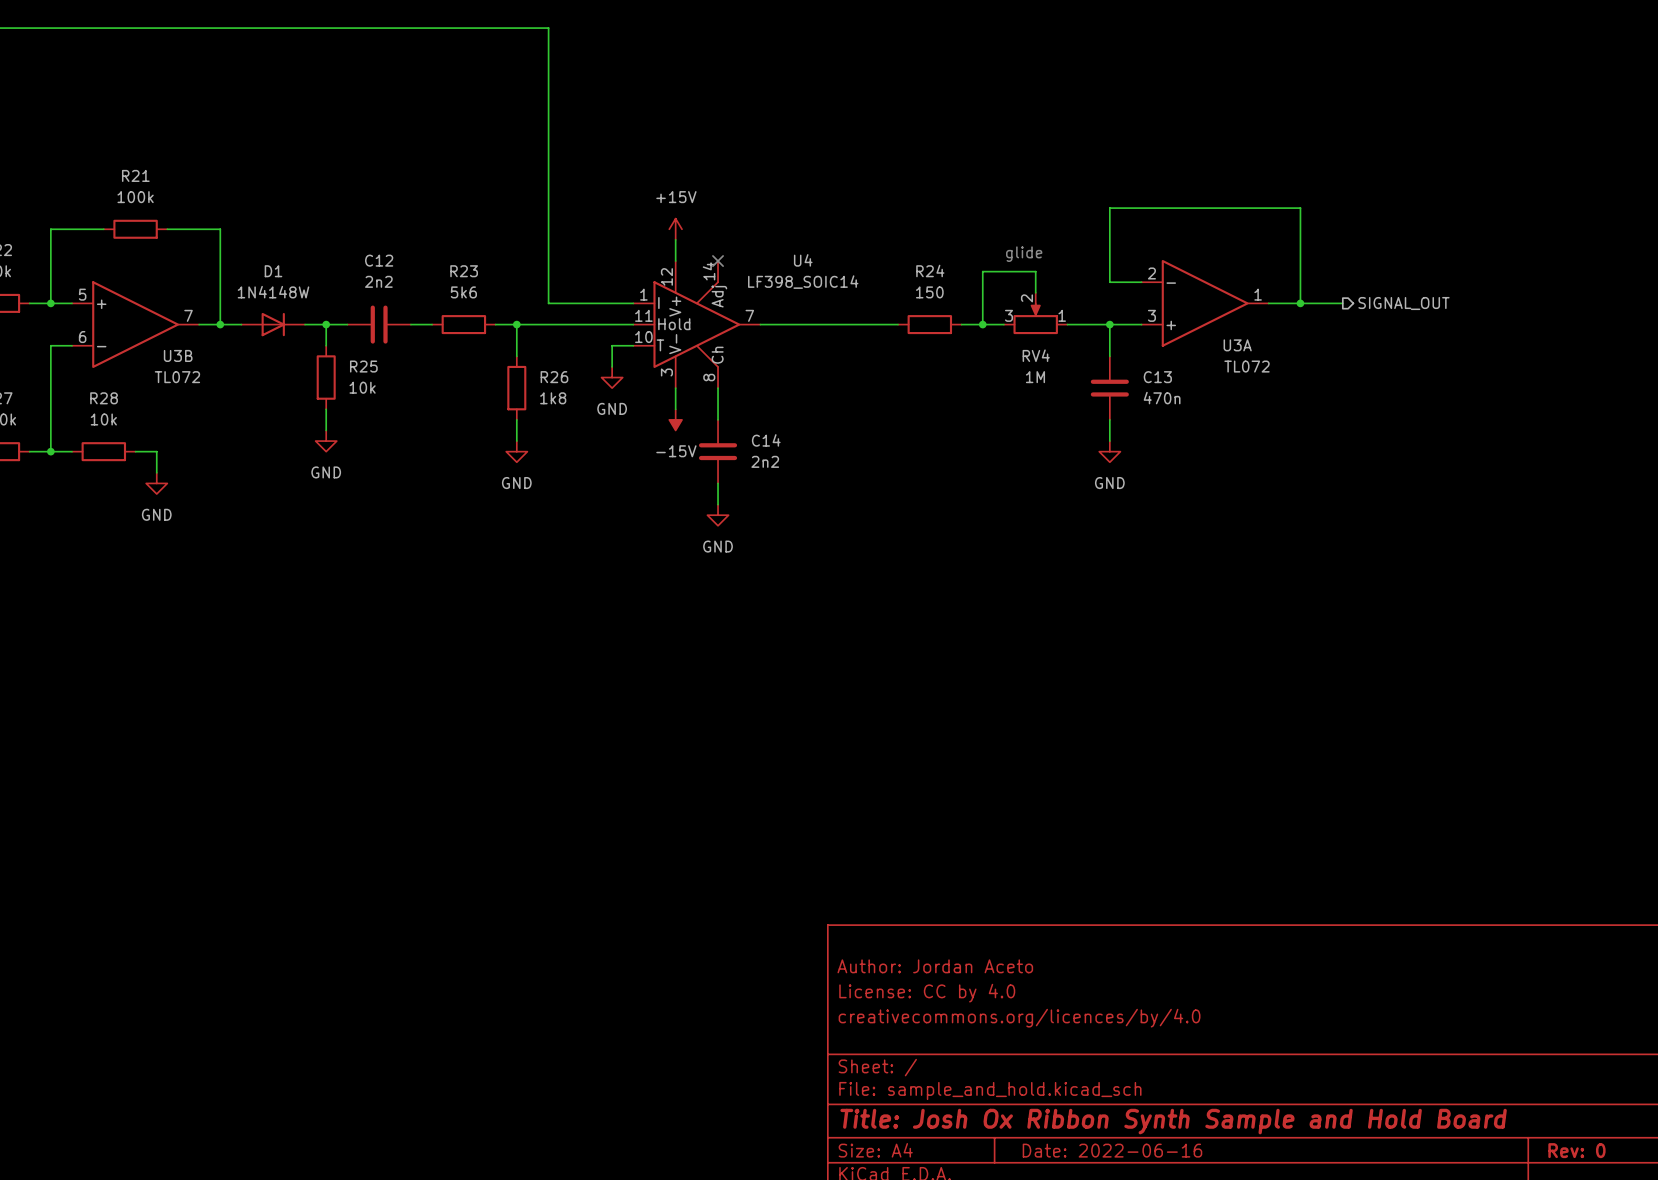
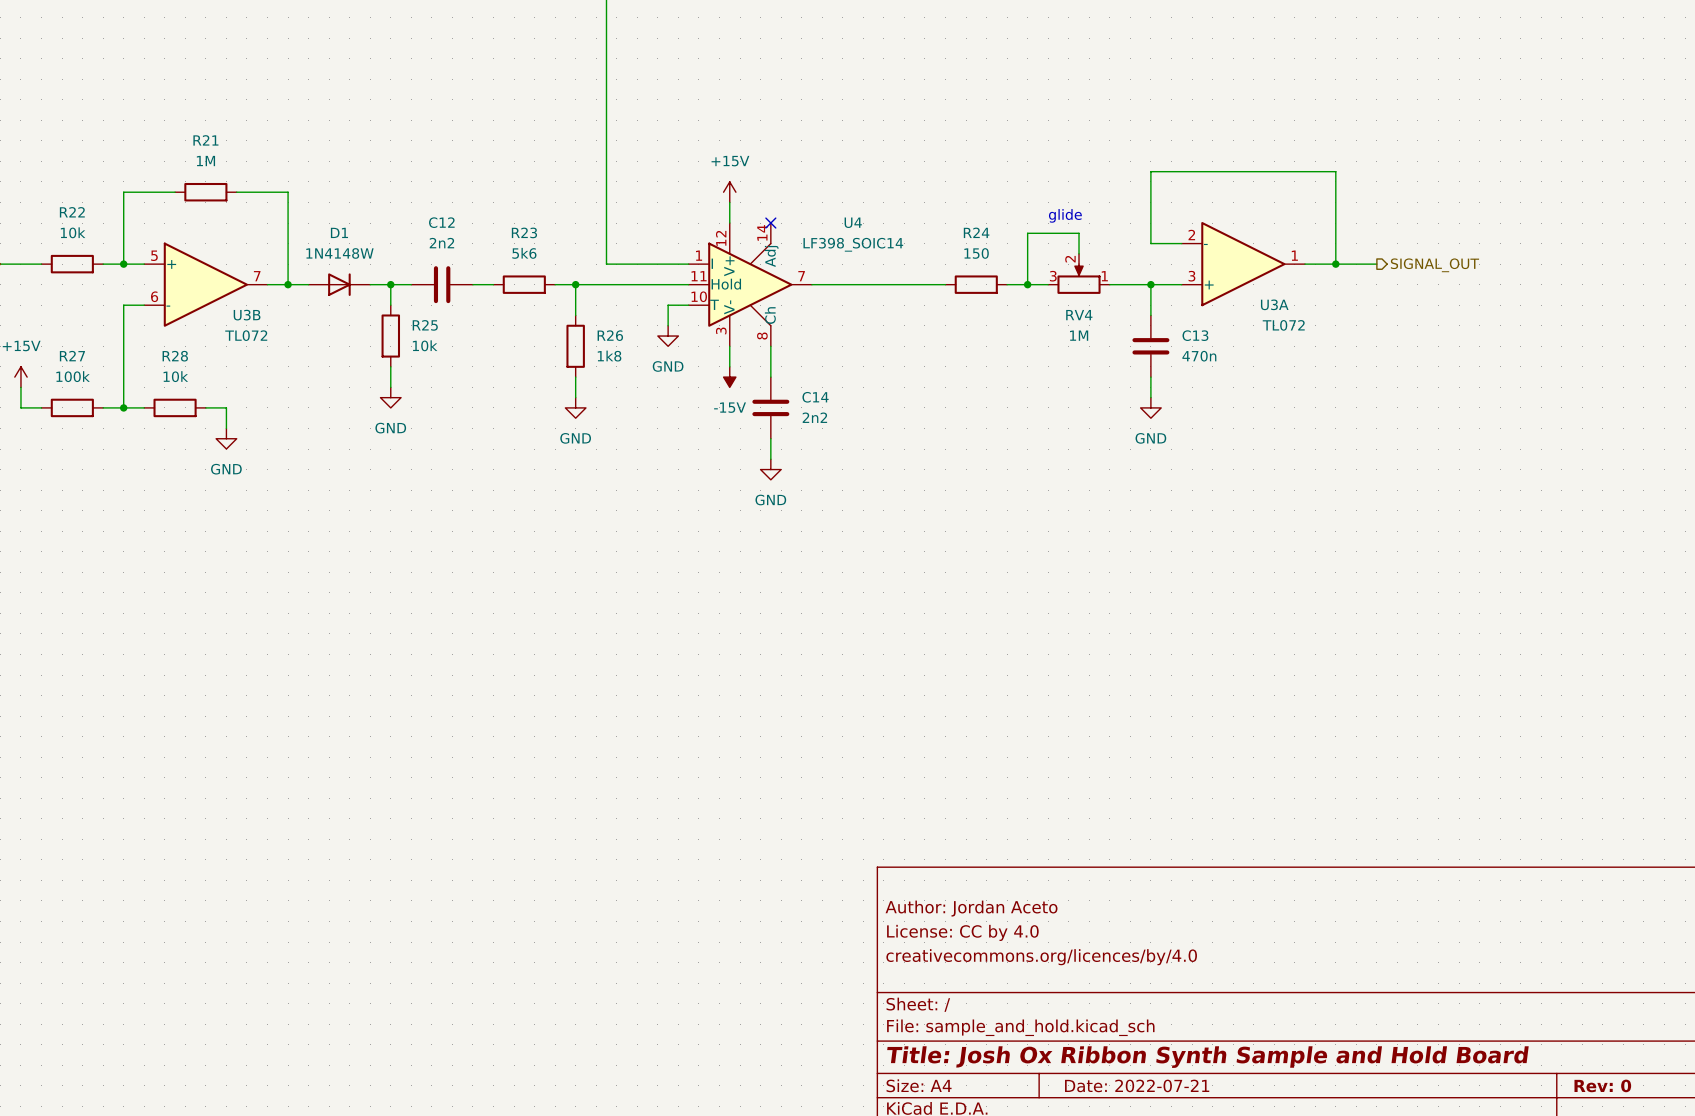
R21 value: 100k (135, 197) -> 1M (205, 161)
title block: Date: 2022-06-16 (1112, 1150) -> Date: 2022-07-21 (1137, 1085)

